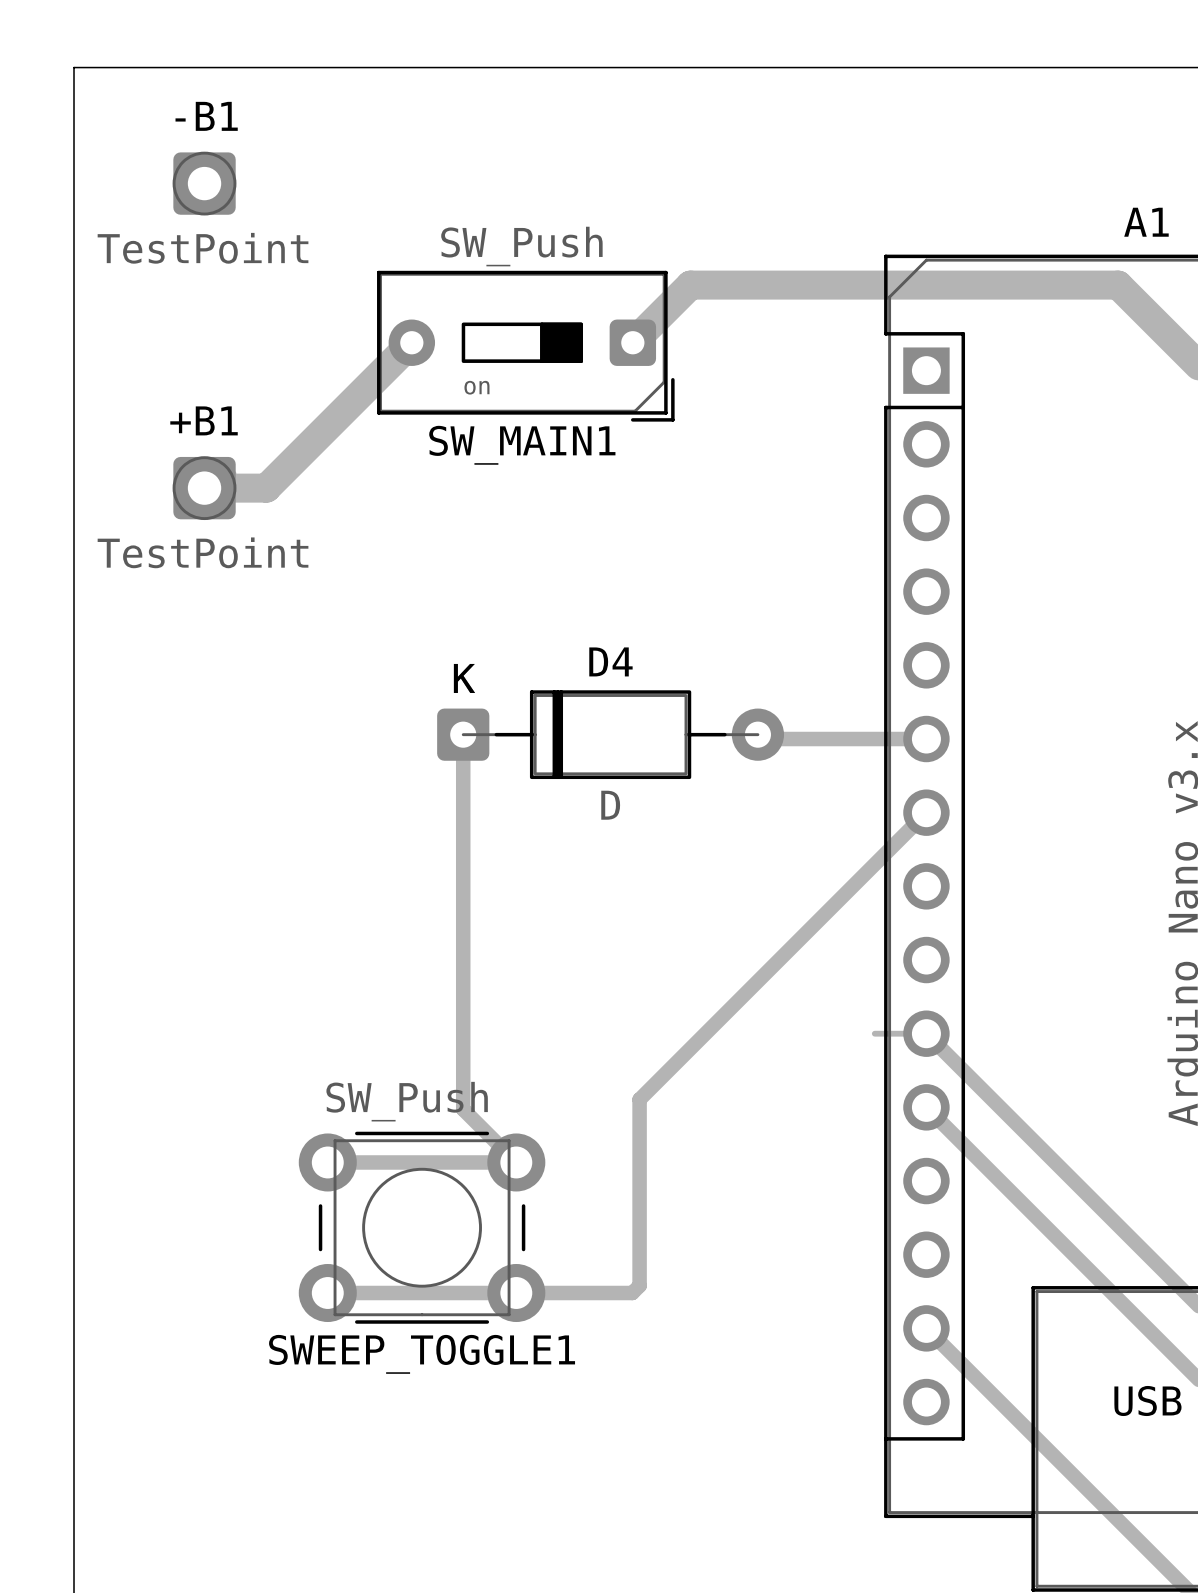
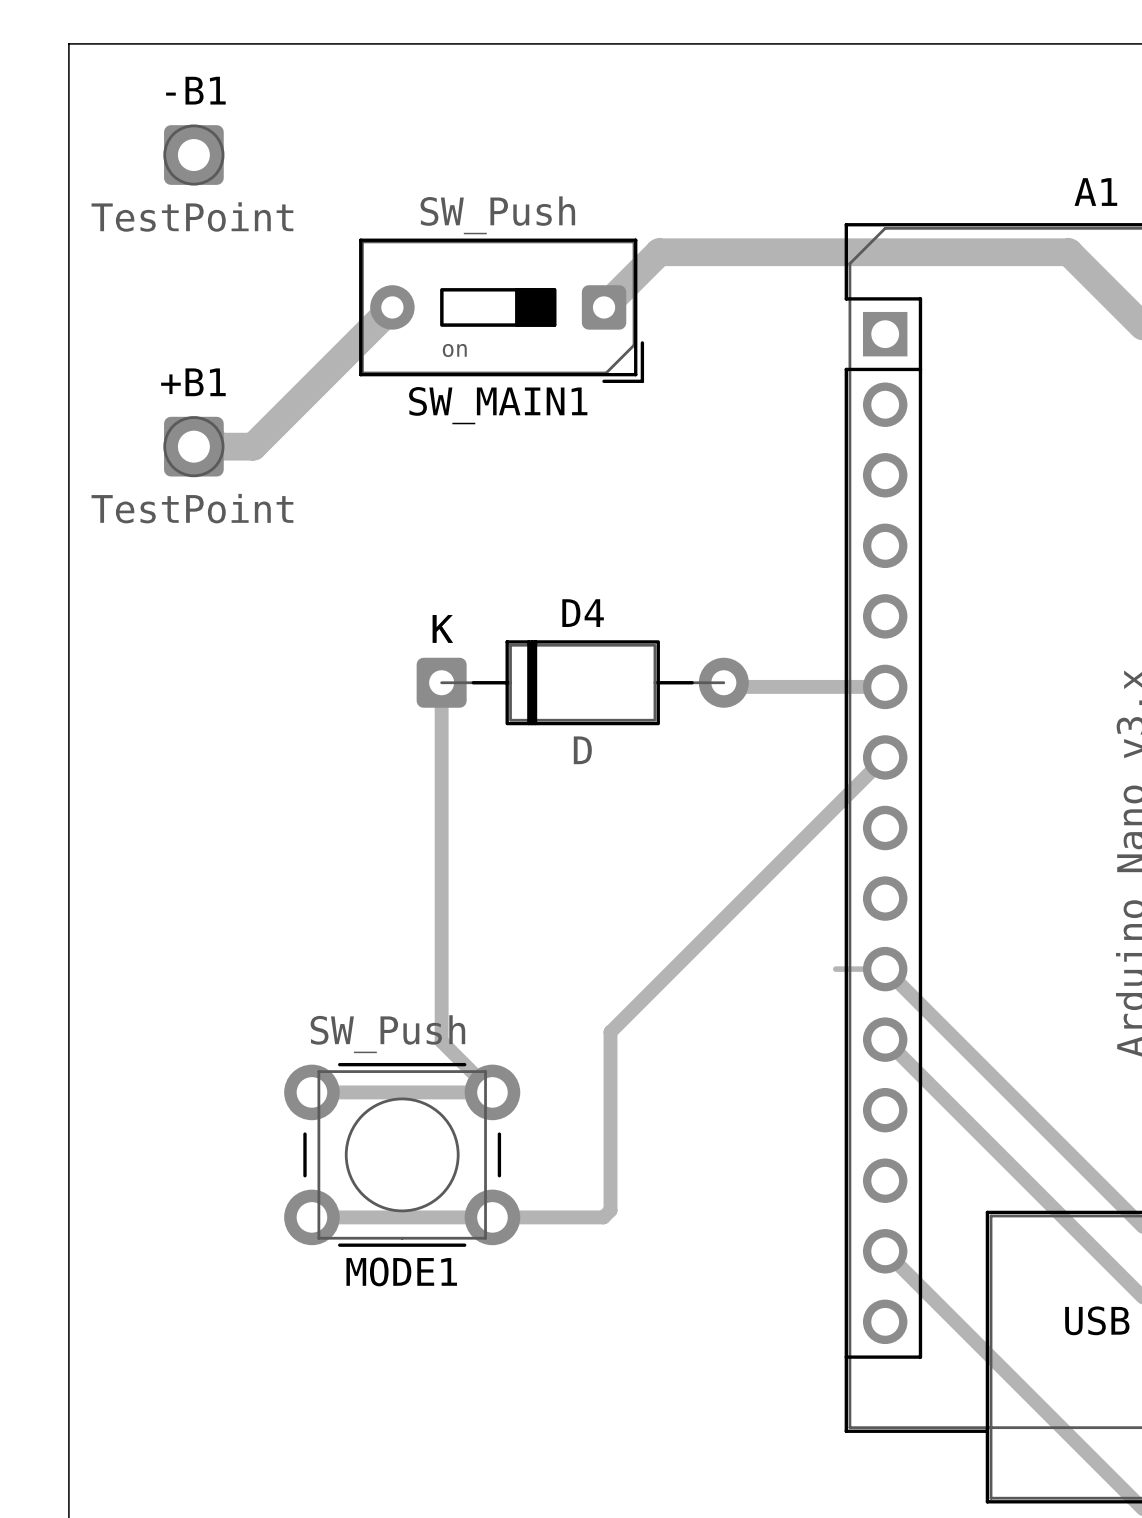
SWEEP_TOGGLE1 name: SWEEP_TOGGLE1 (422, 1354) -> MODE1 (401, 1271)

